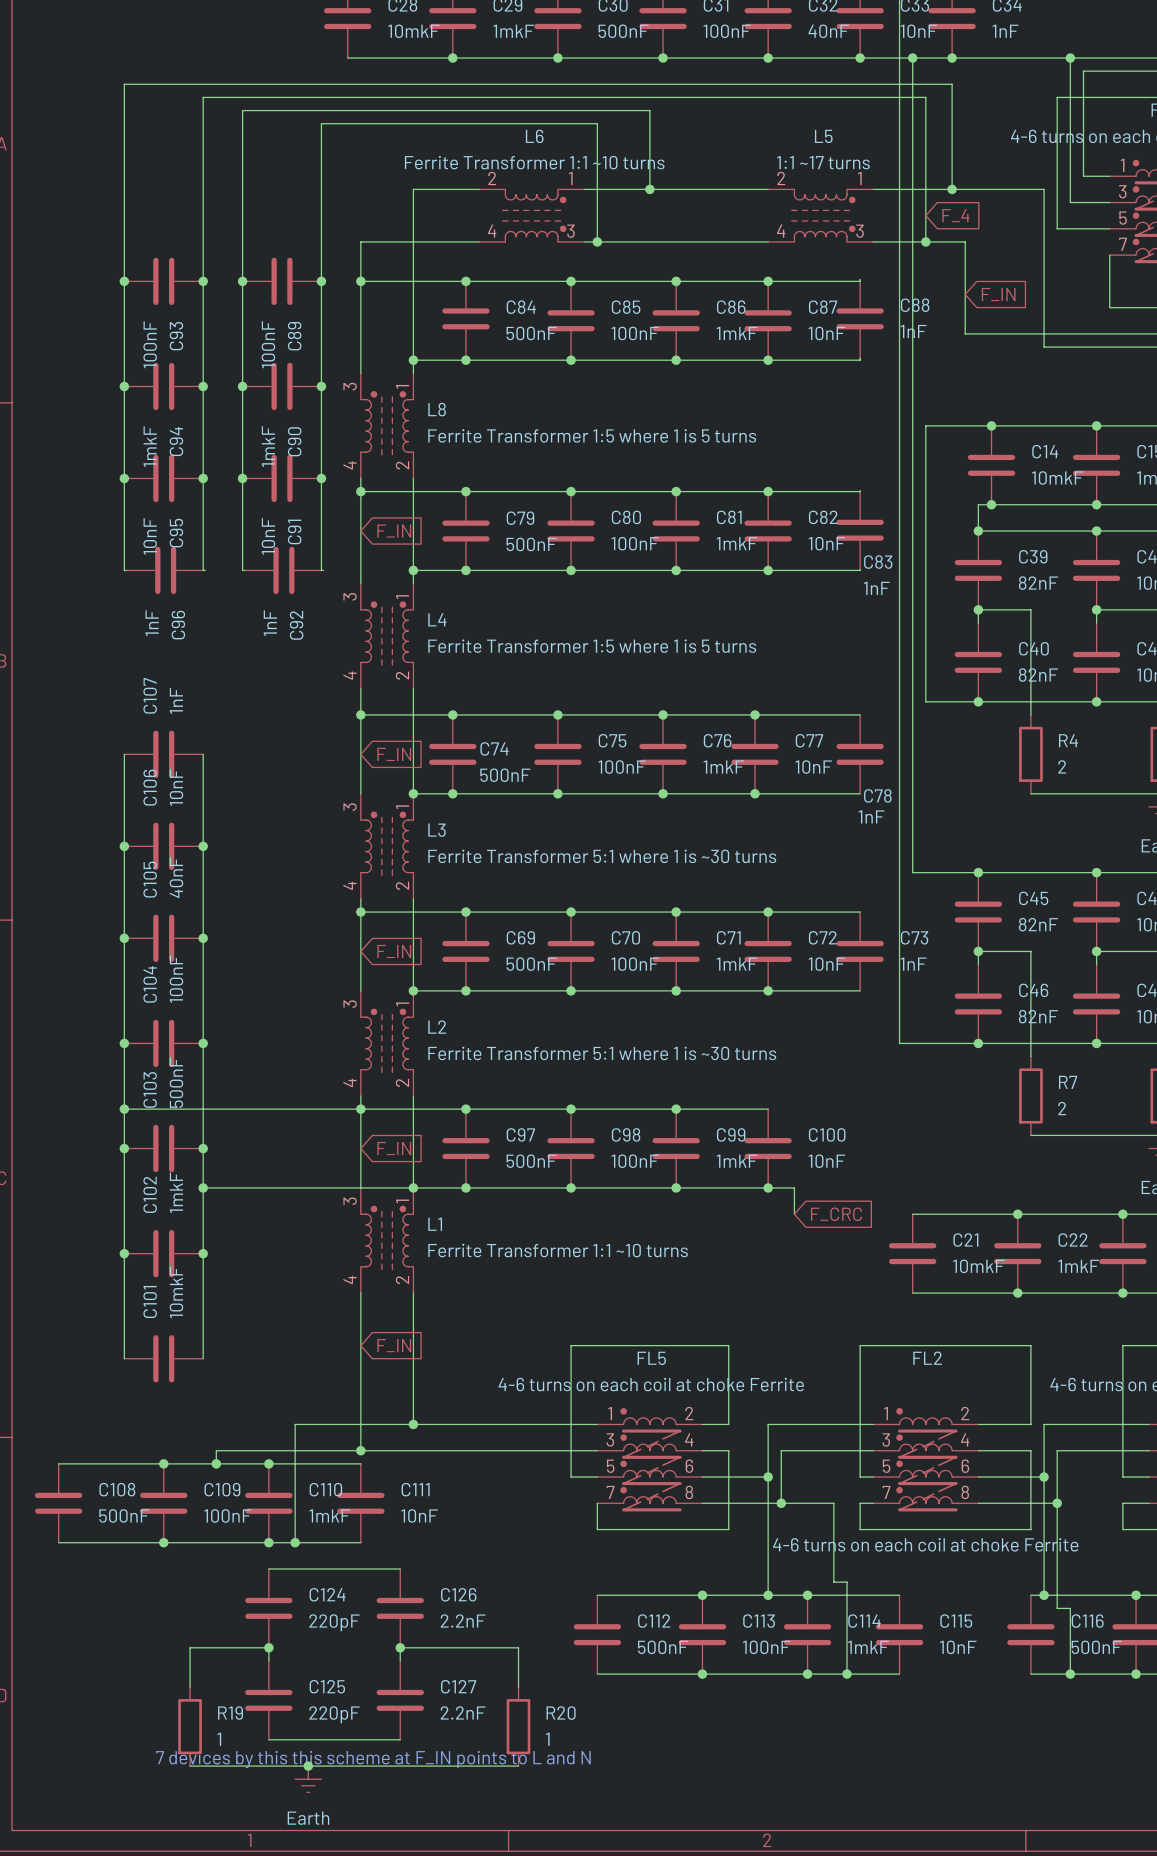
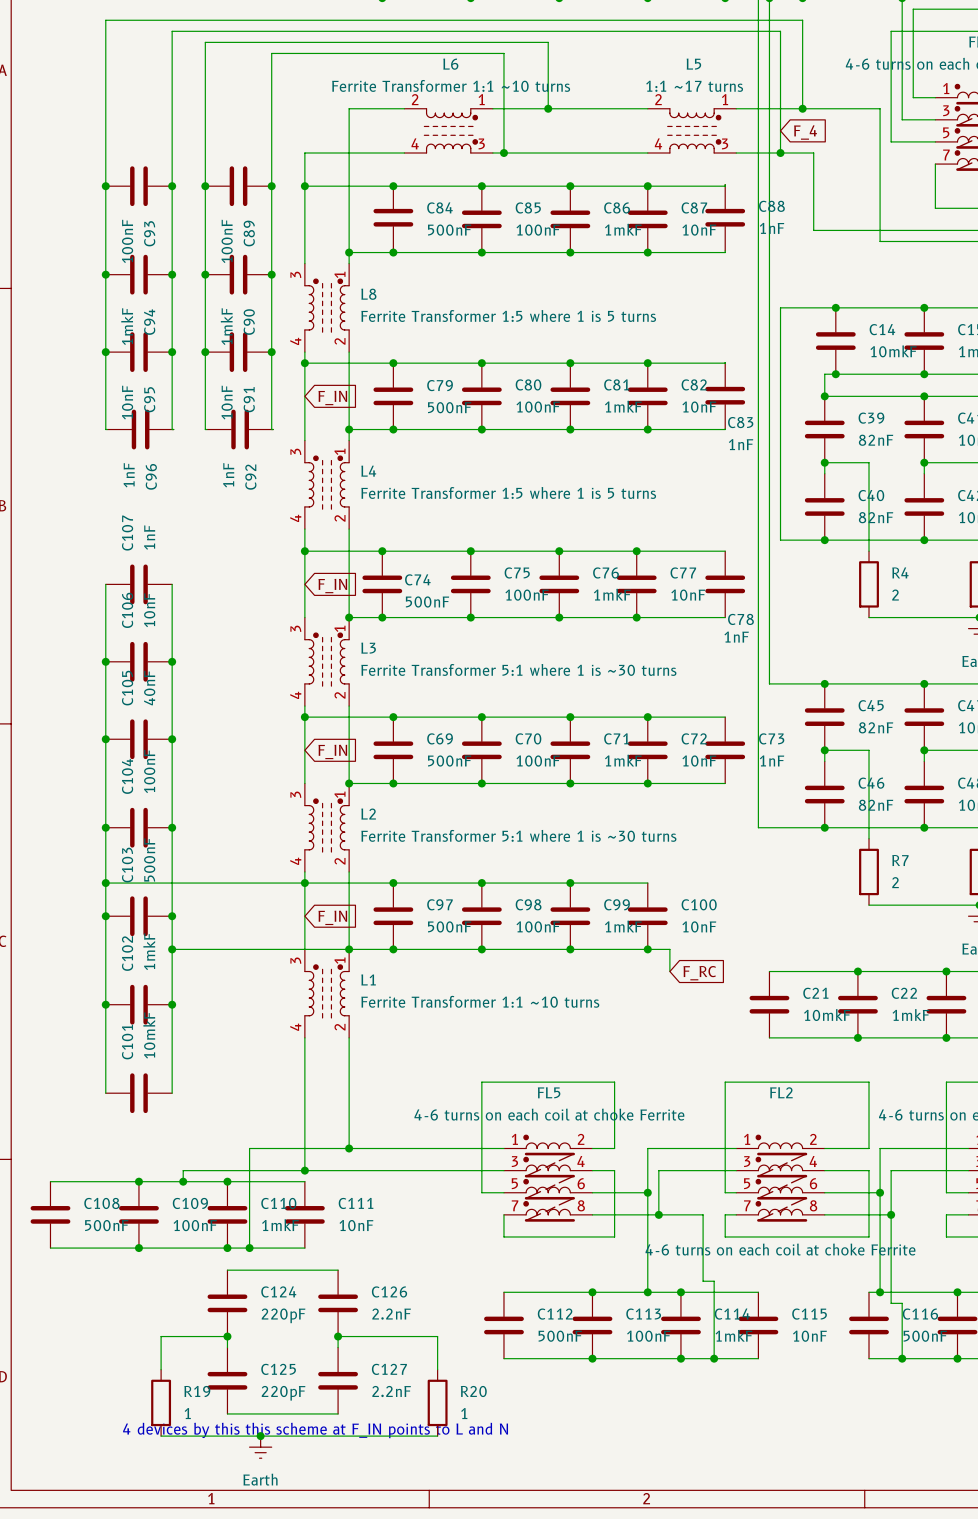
global label: F_IN (998, 294) -> none
global label: F_CRC (836, 1214) -> F_RC (699, 973)
global label: F_IN (394, 1345) -> none
text: 7 devices by this this scheme at F_IN points to L and N (373, 1759) -> 4 devices by this this scheme at F_IN points to L and N (315, 1430)

